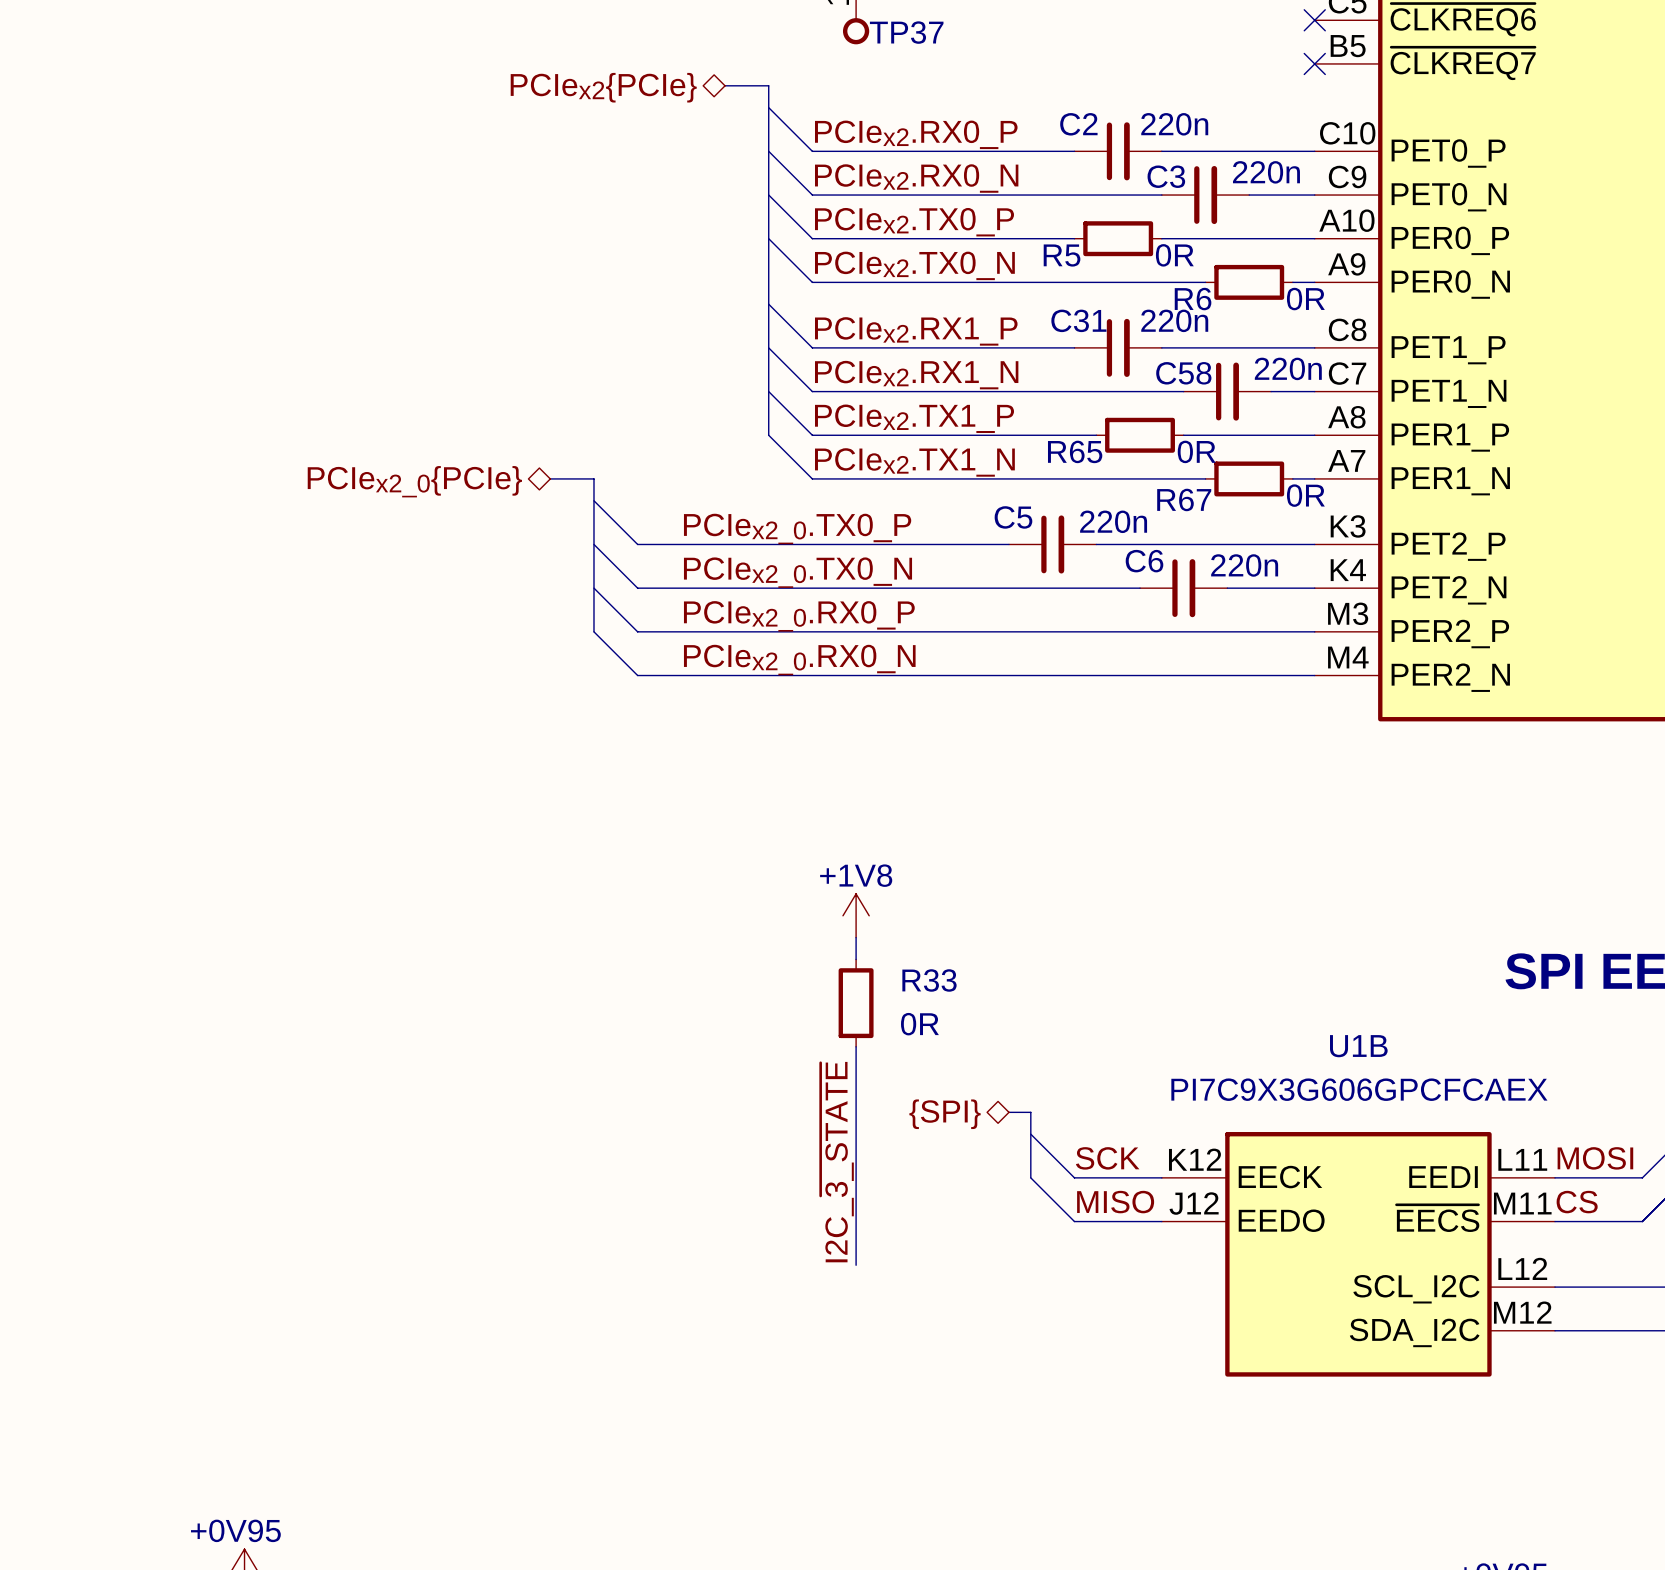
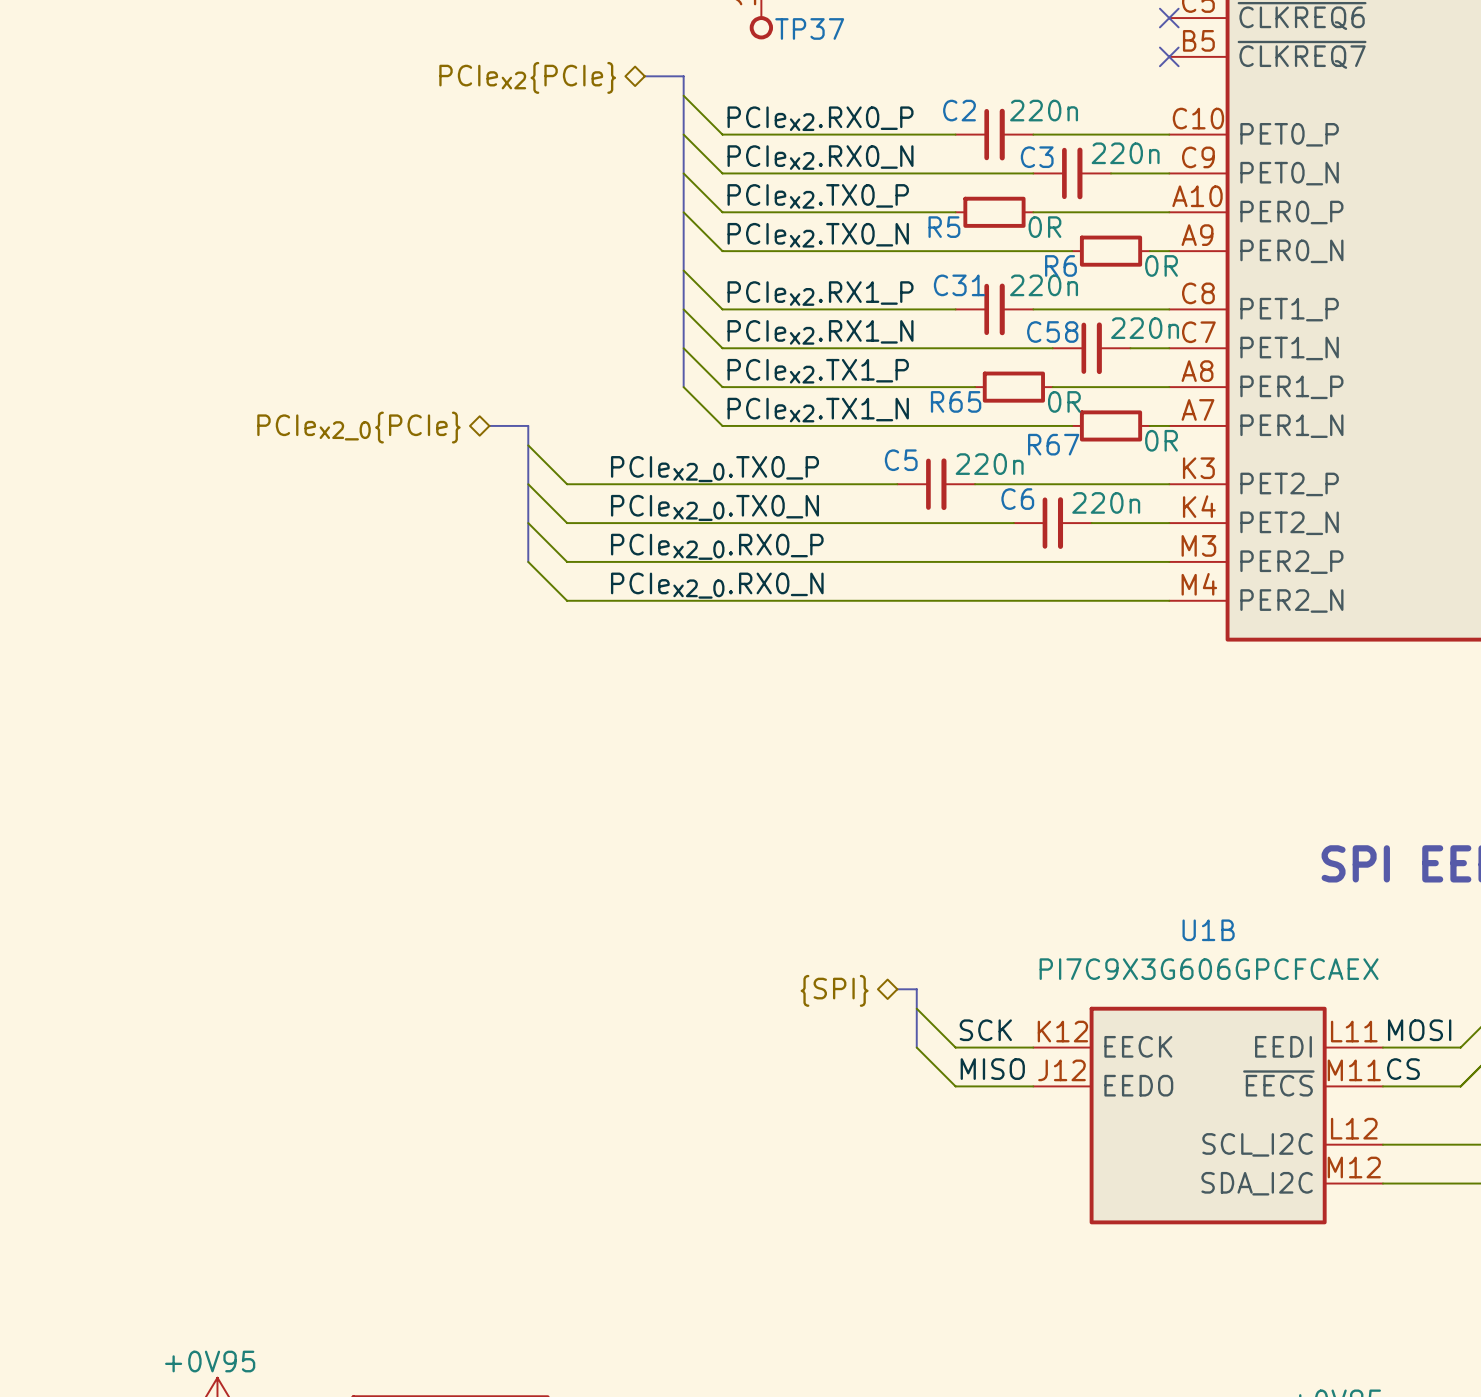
power symbol: +1V8 (856, 915) -> none
wire: (856, 937) (856, 959) -> none
R33: (856, 1003) -> none
wire: (856, 1046) (856, 1265) -> none
label: I2C_~{3_STATE} (837, 1162) -> none

